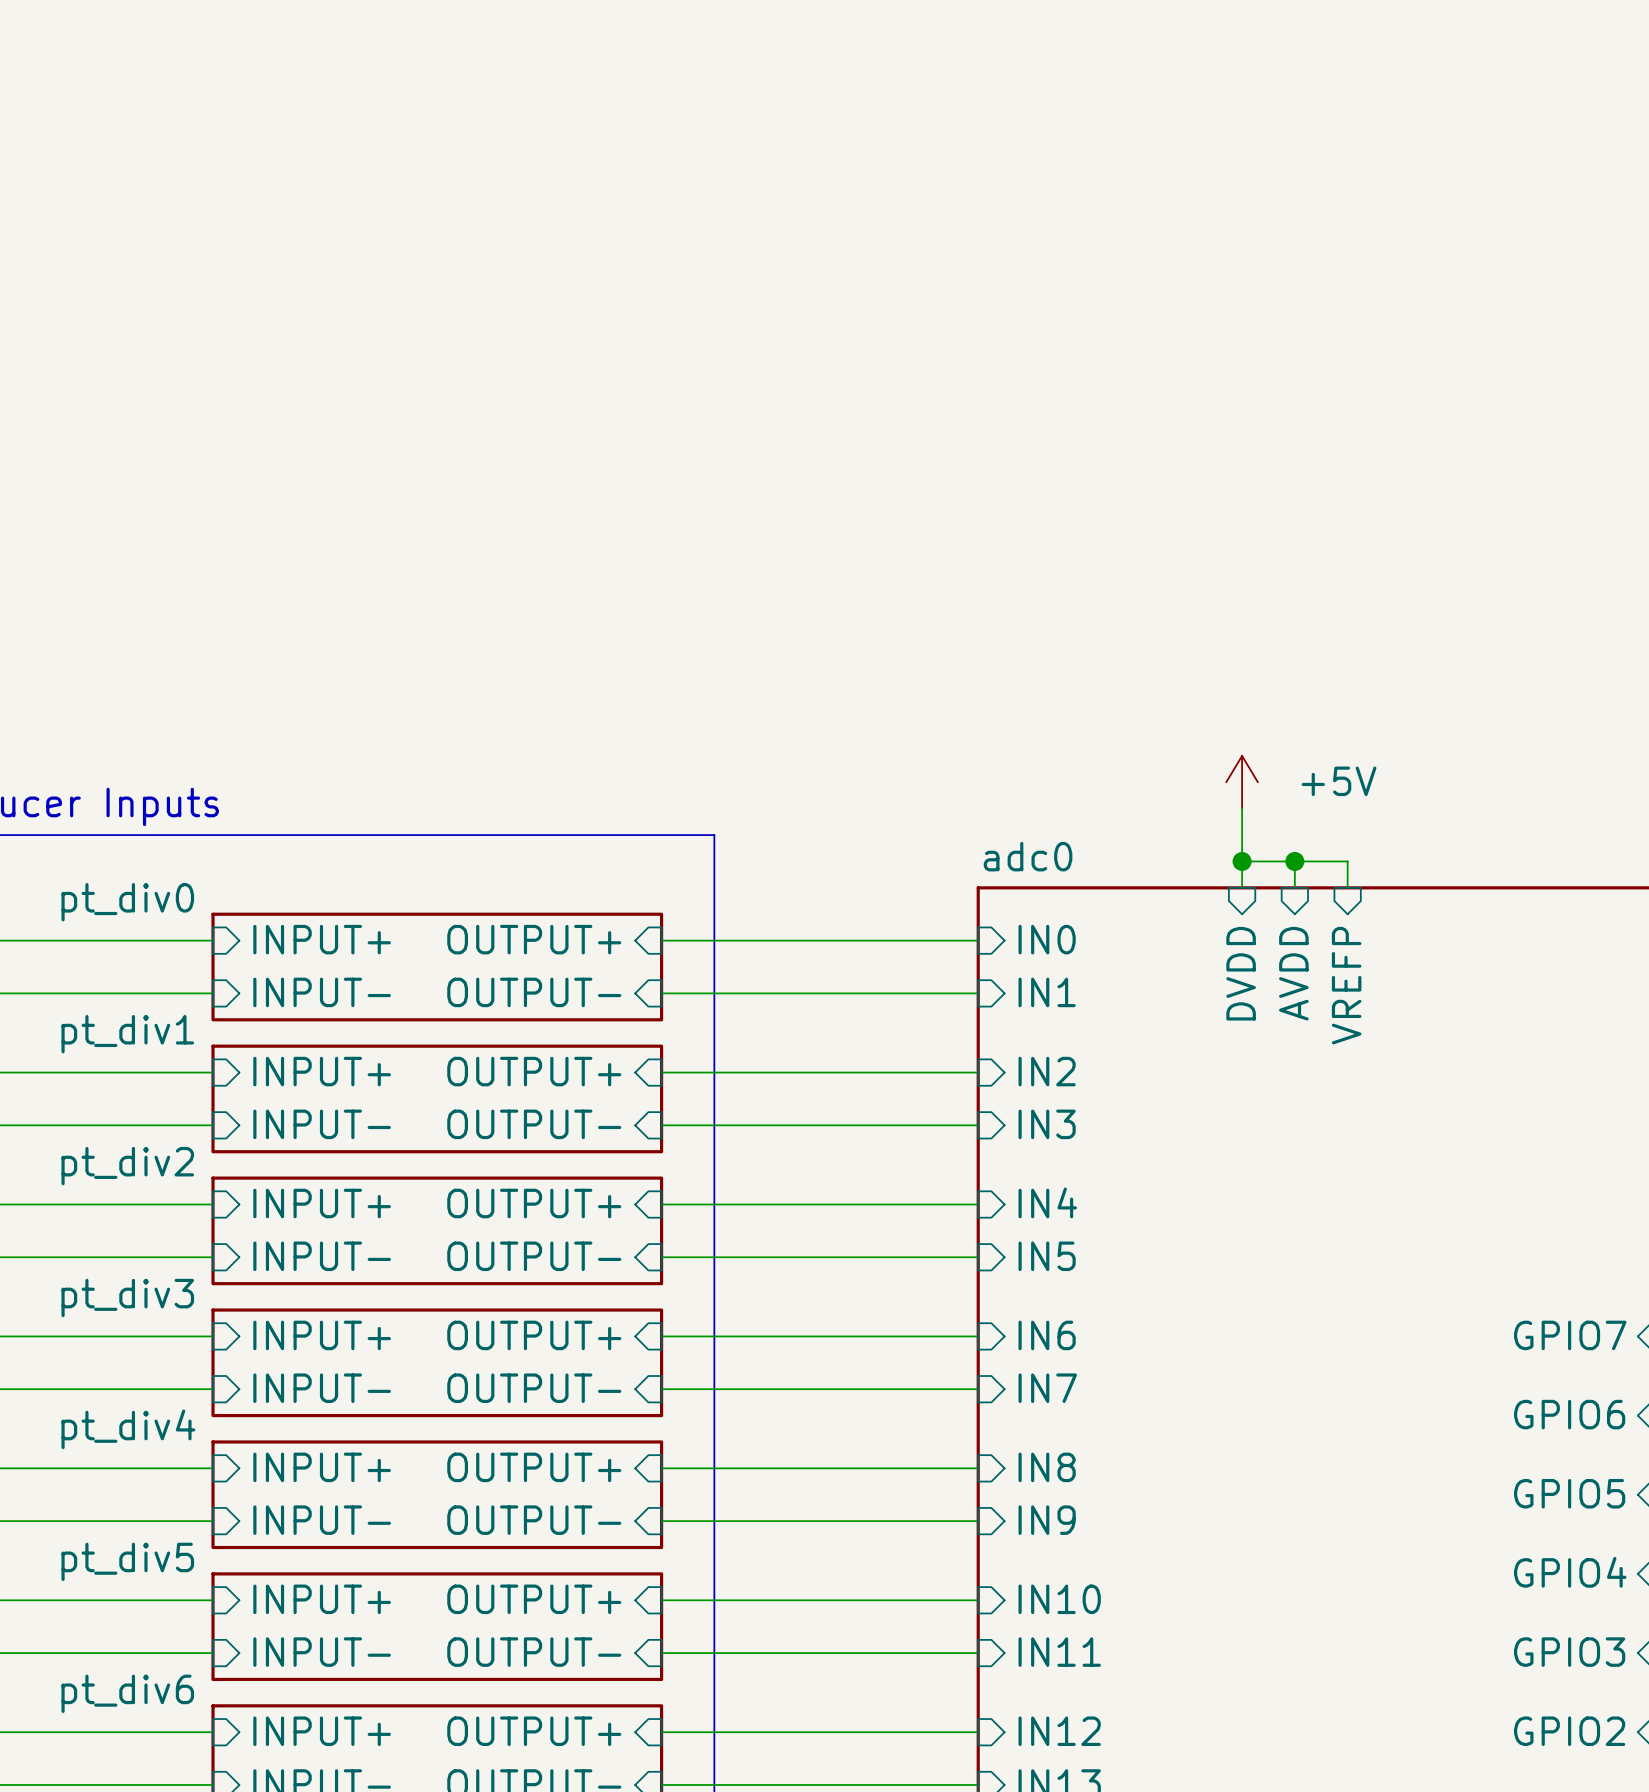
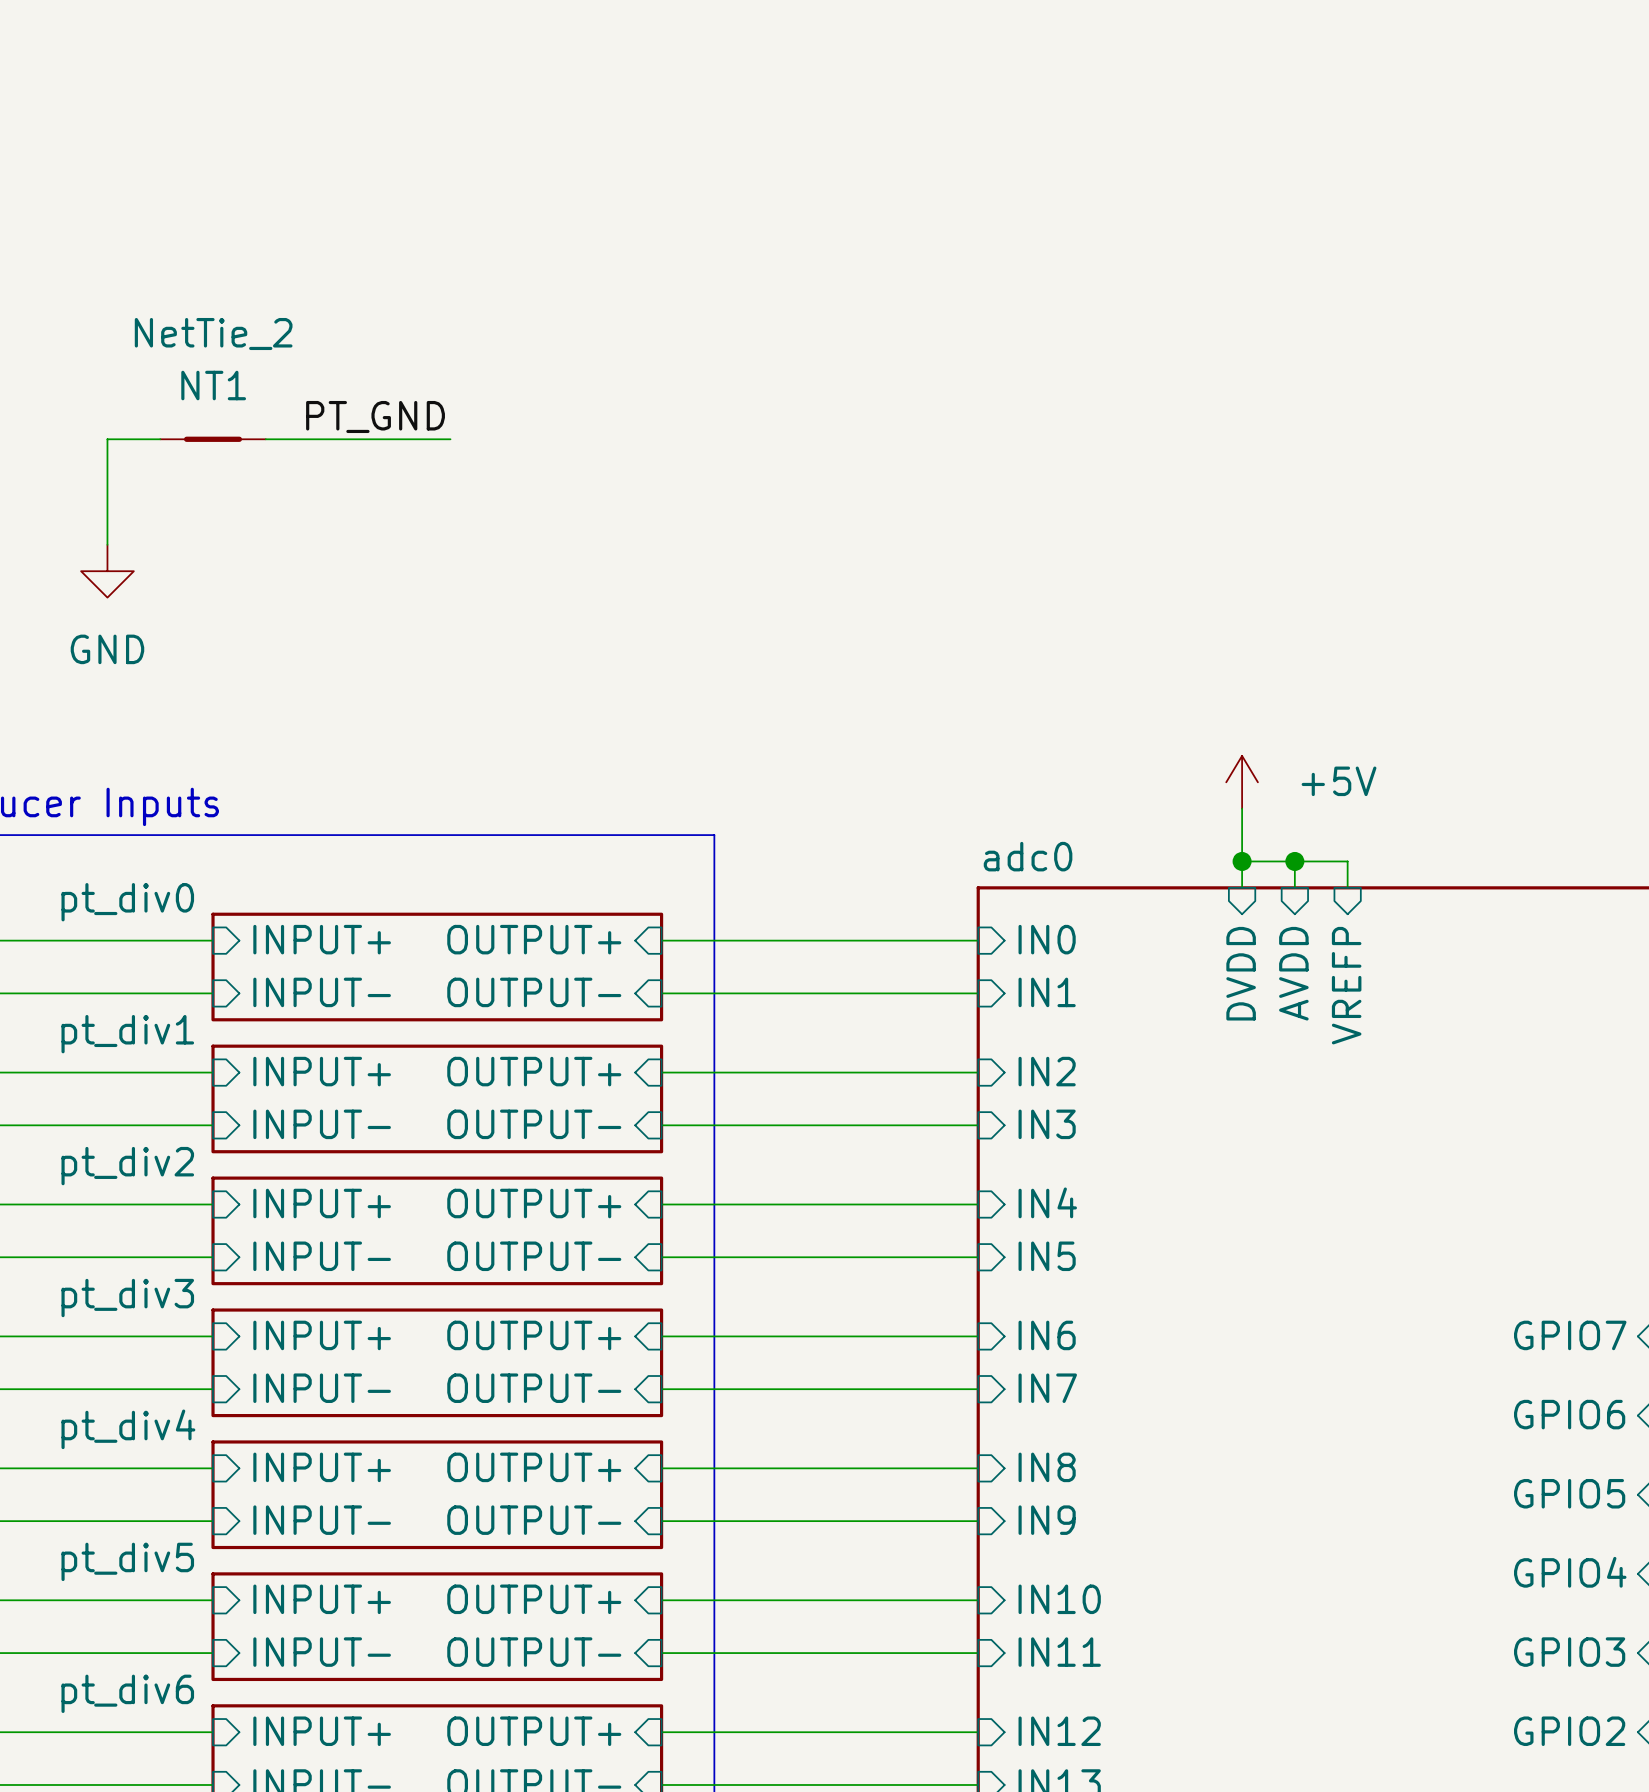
label: none -> PT_GND (375, 416)
wire: none -> (160, 439) (107, 439) (107, 544)
NT1: none -> NetTie_2 (213, 439)
wire: none -> (265, 439) (450, 439)
power symbol: none -> GND (107, 571)

